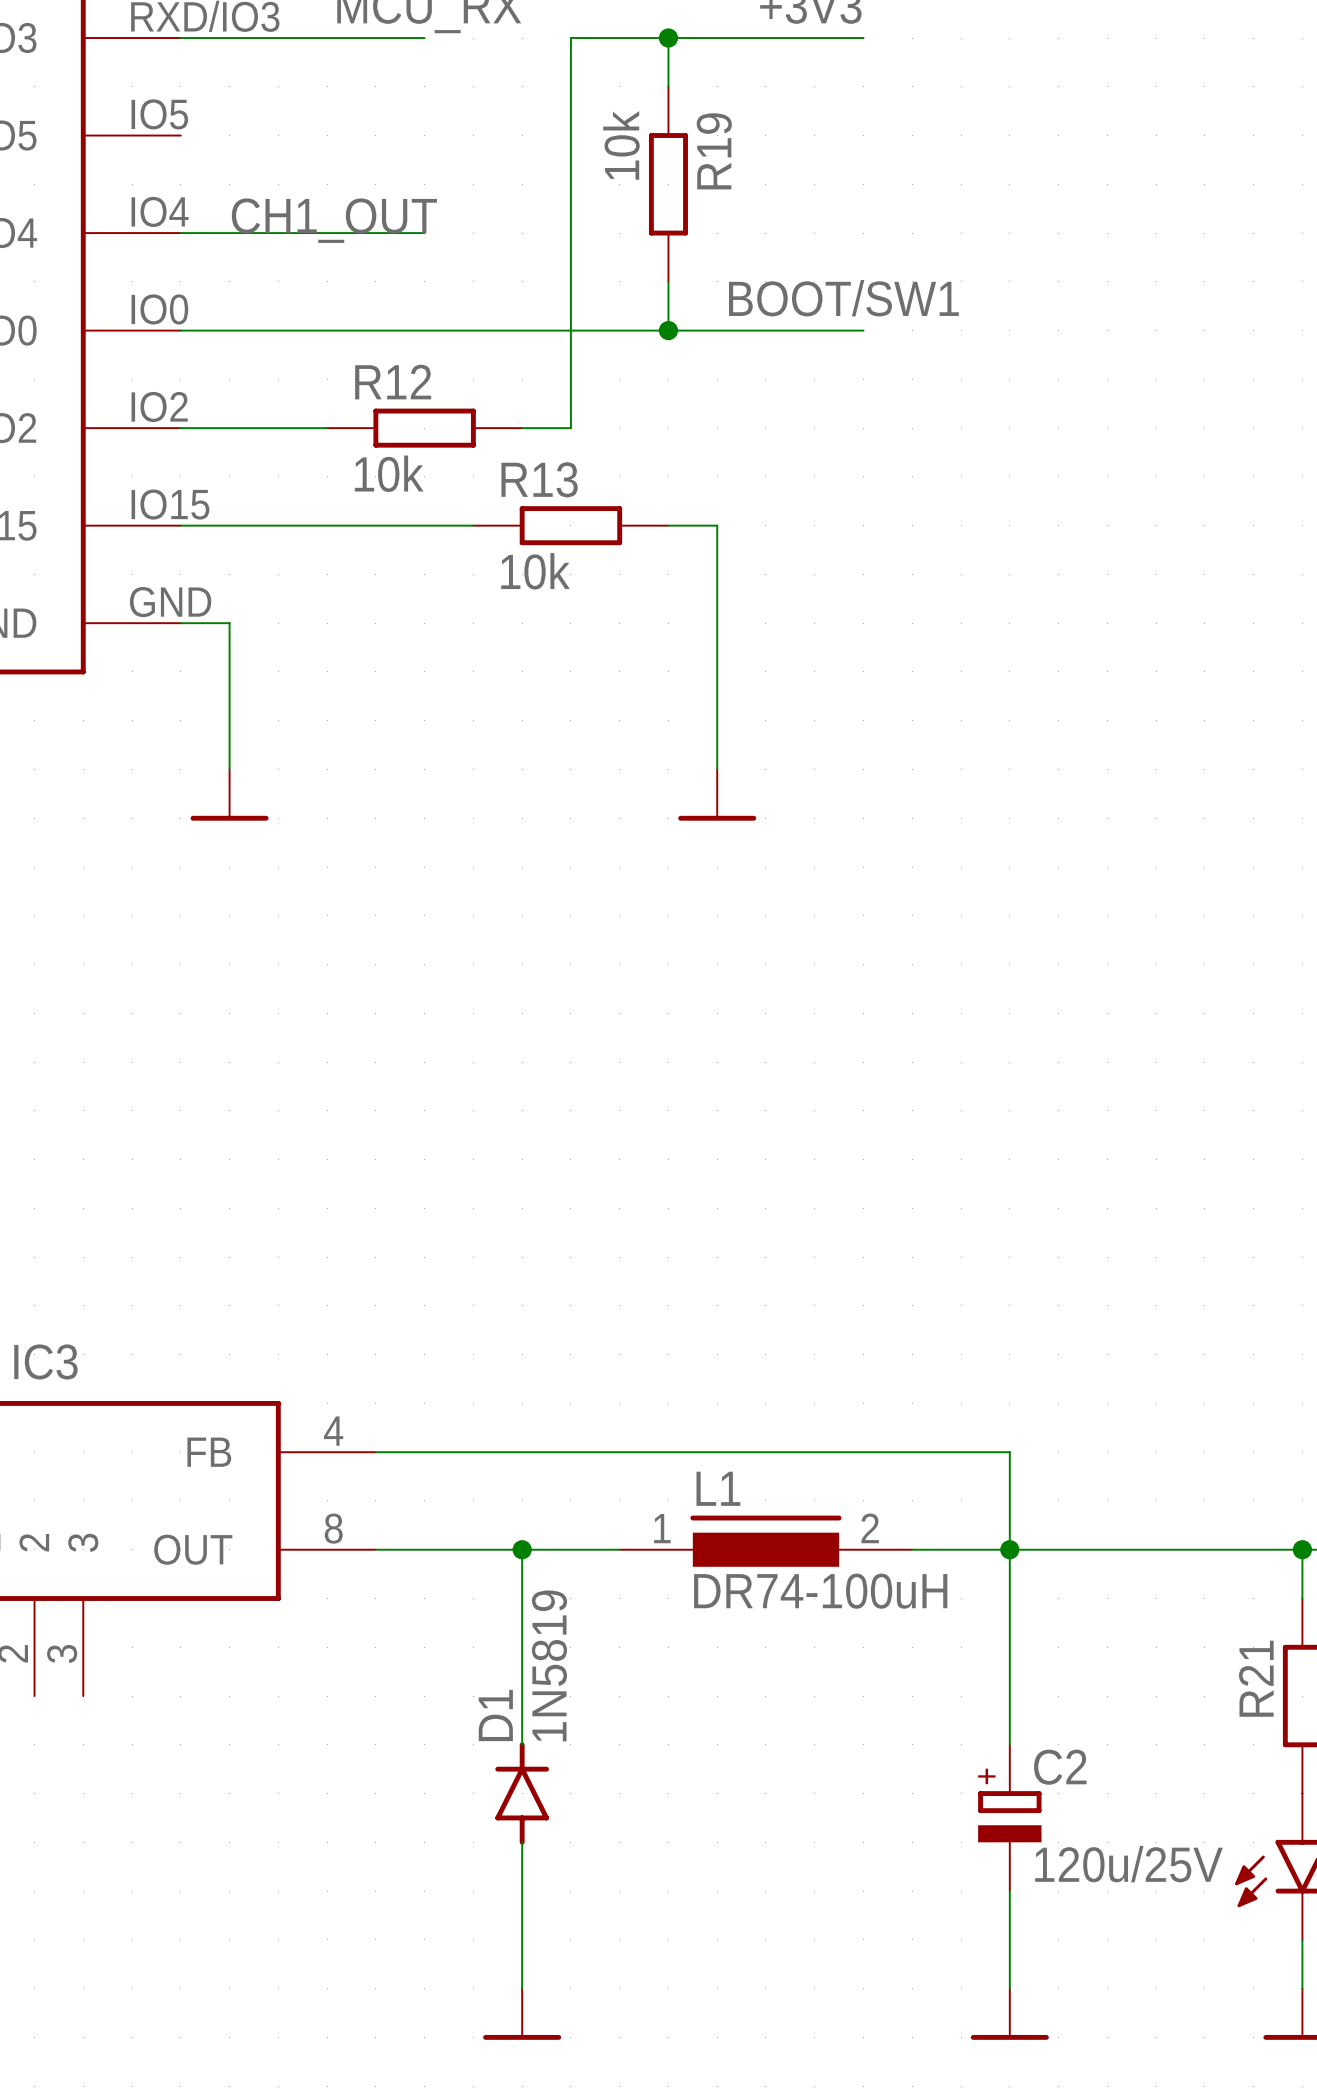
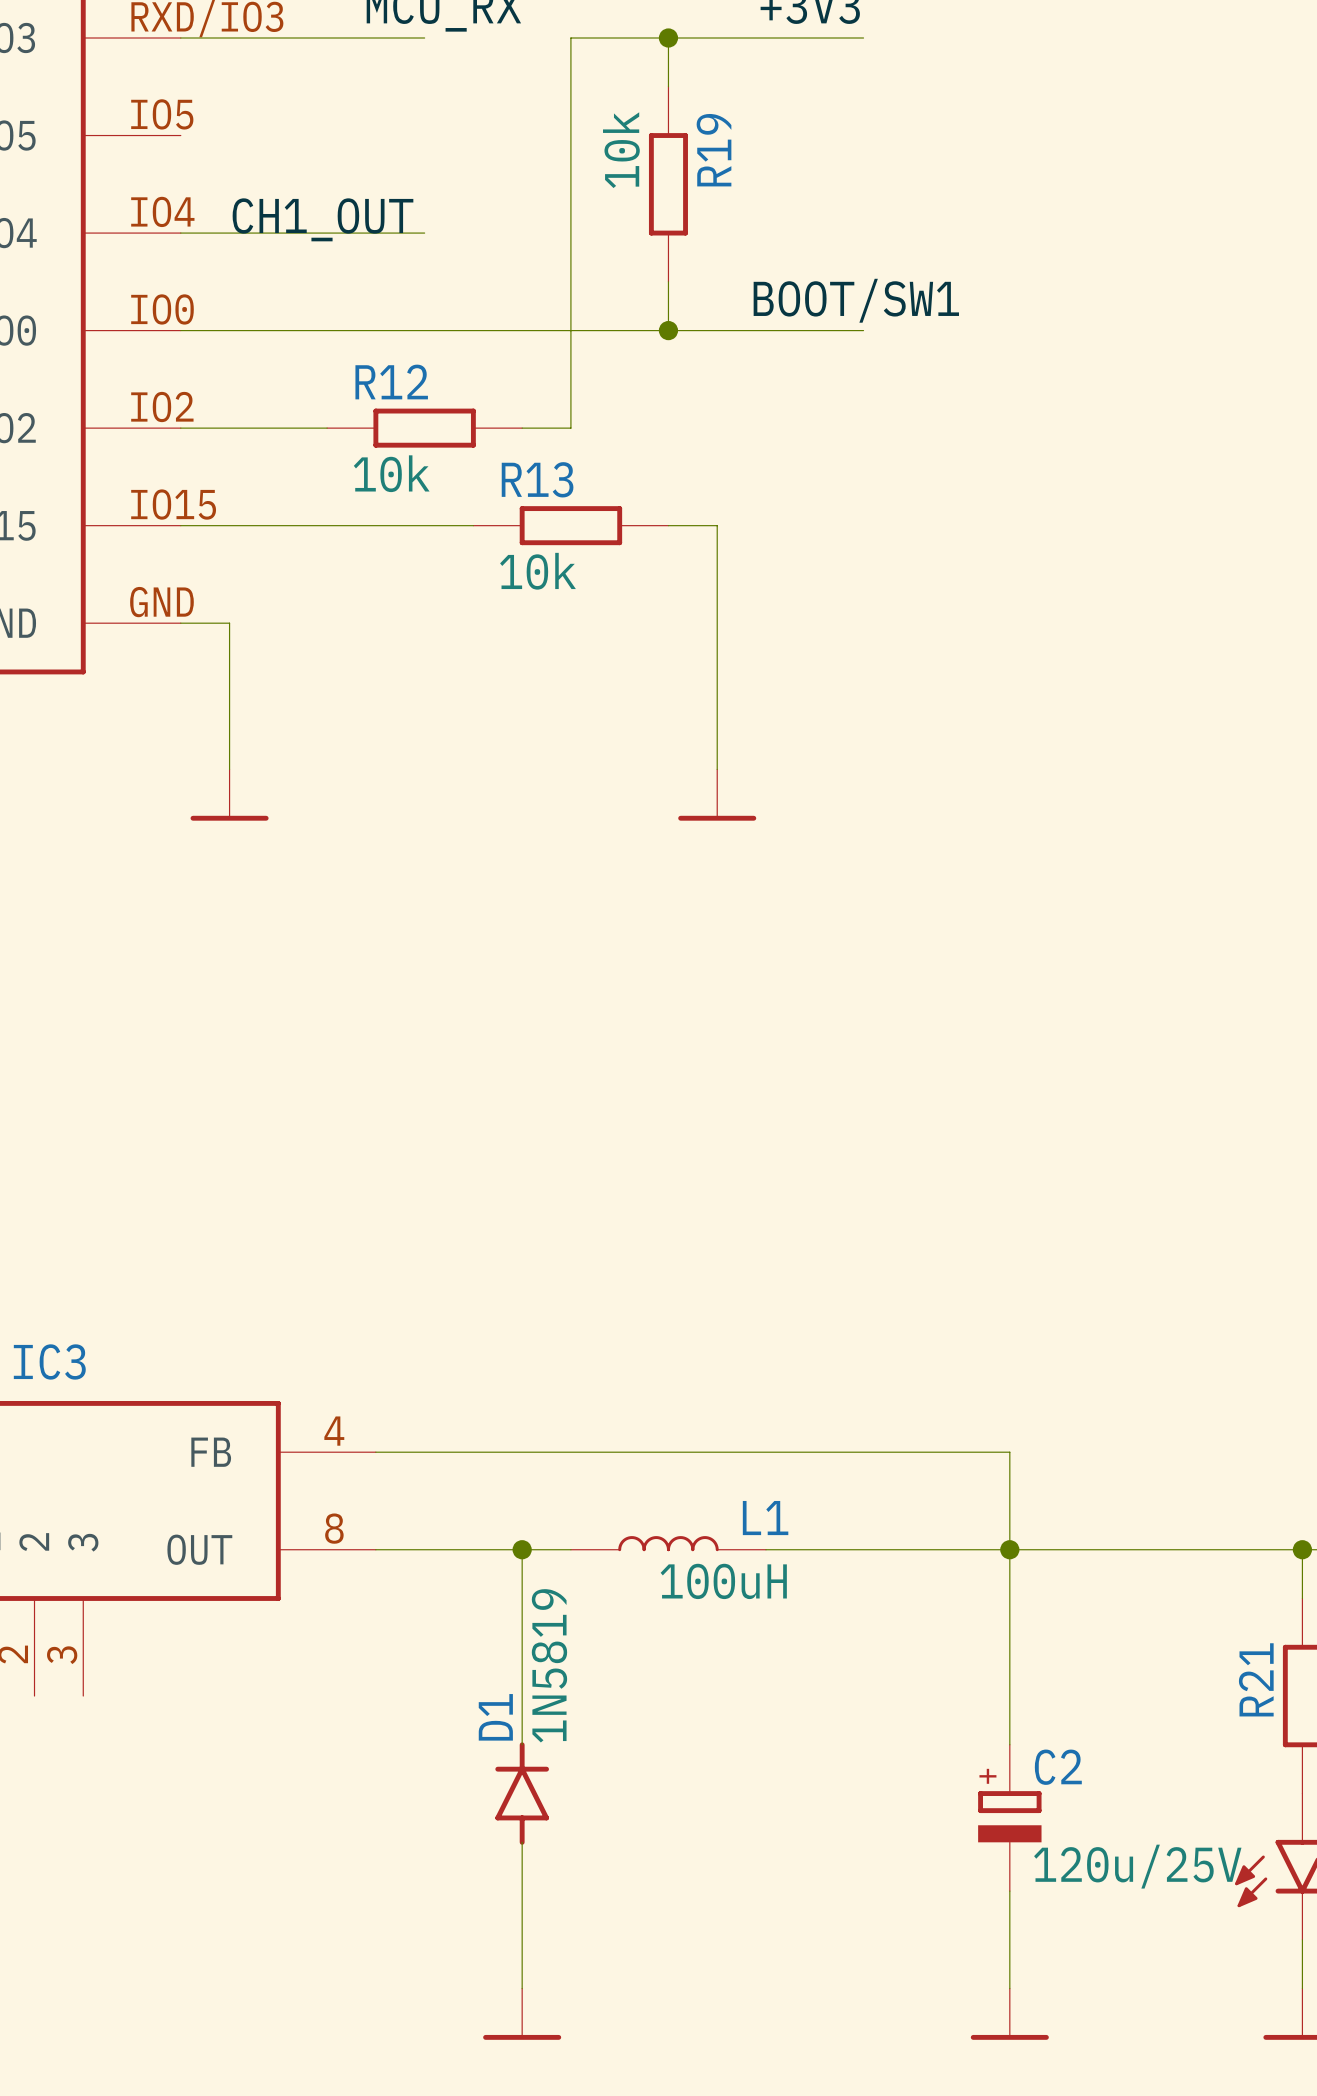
L1 name position: L1 (718, 1488) -> L1 (765, 1518)
L1 symbol: [619, 1515, 913, 1567] -> [570, 1536, 766, 1552]
L1 value: DR74-100uH (820, 1591) -> 100uH (723, 1581)

